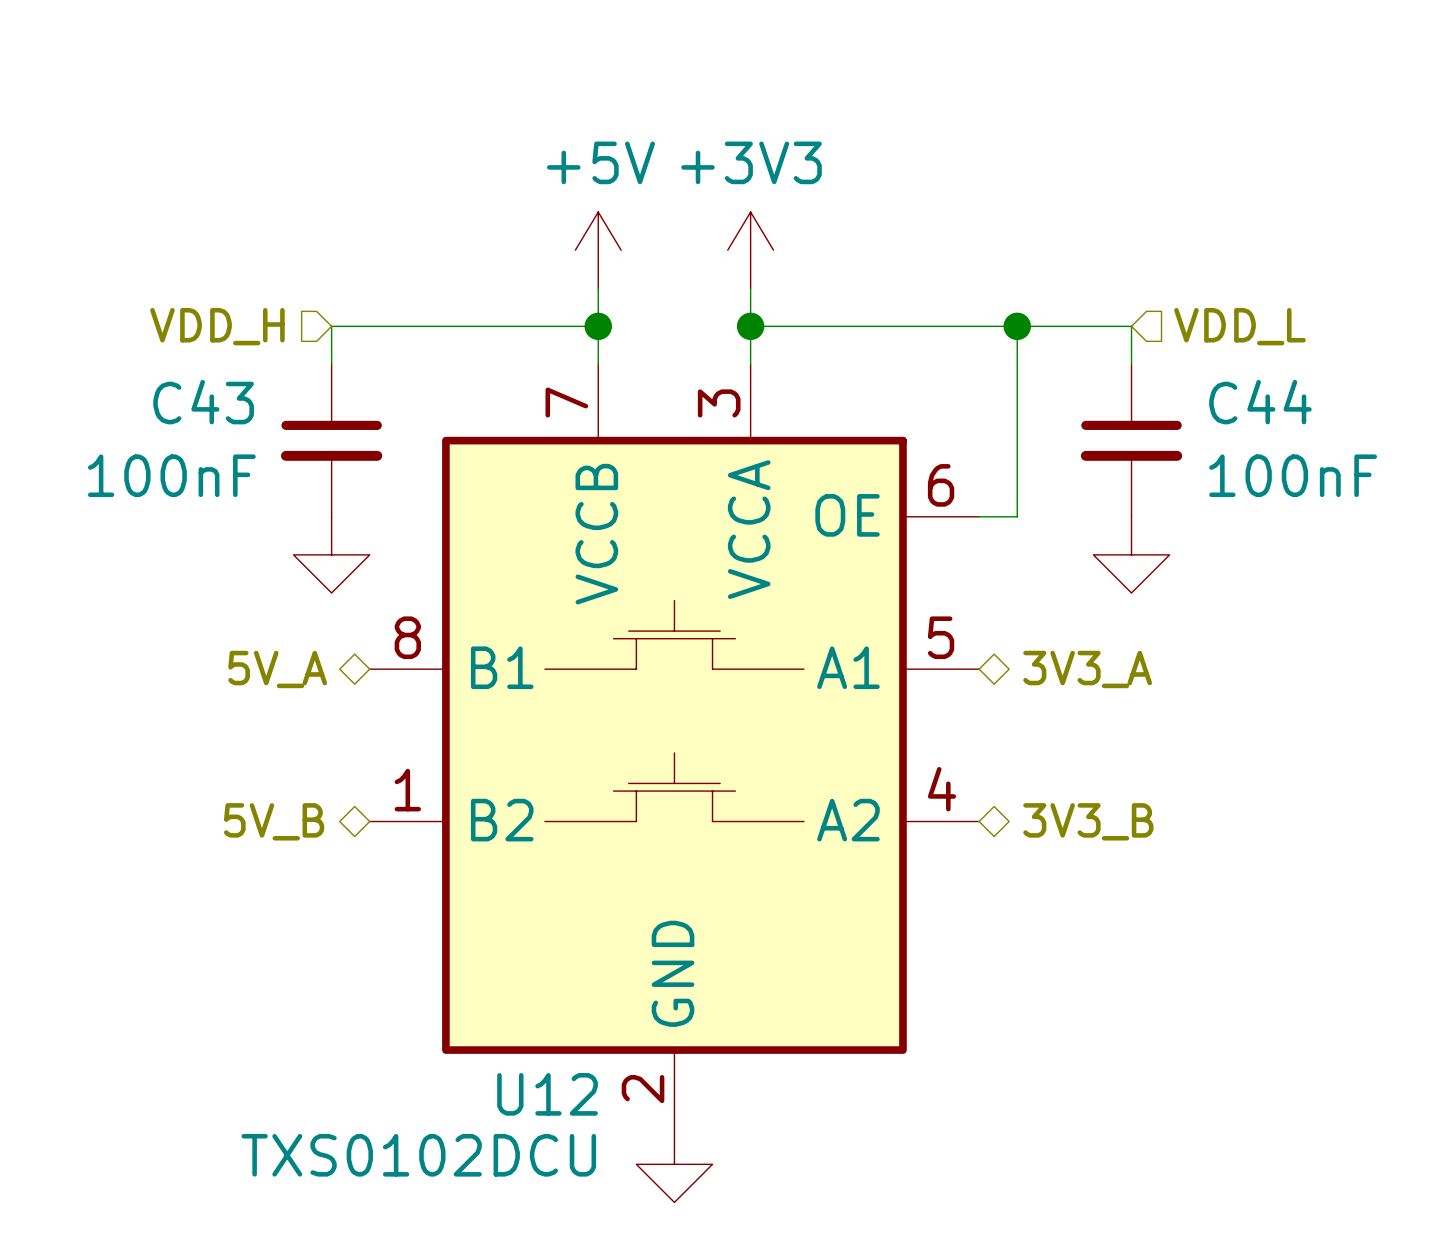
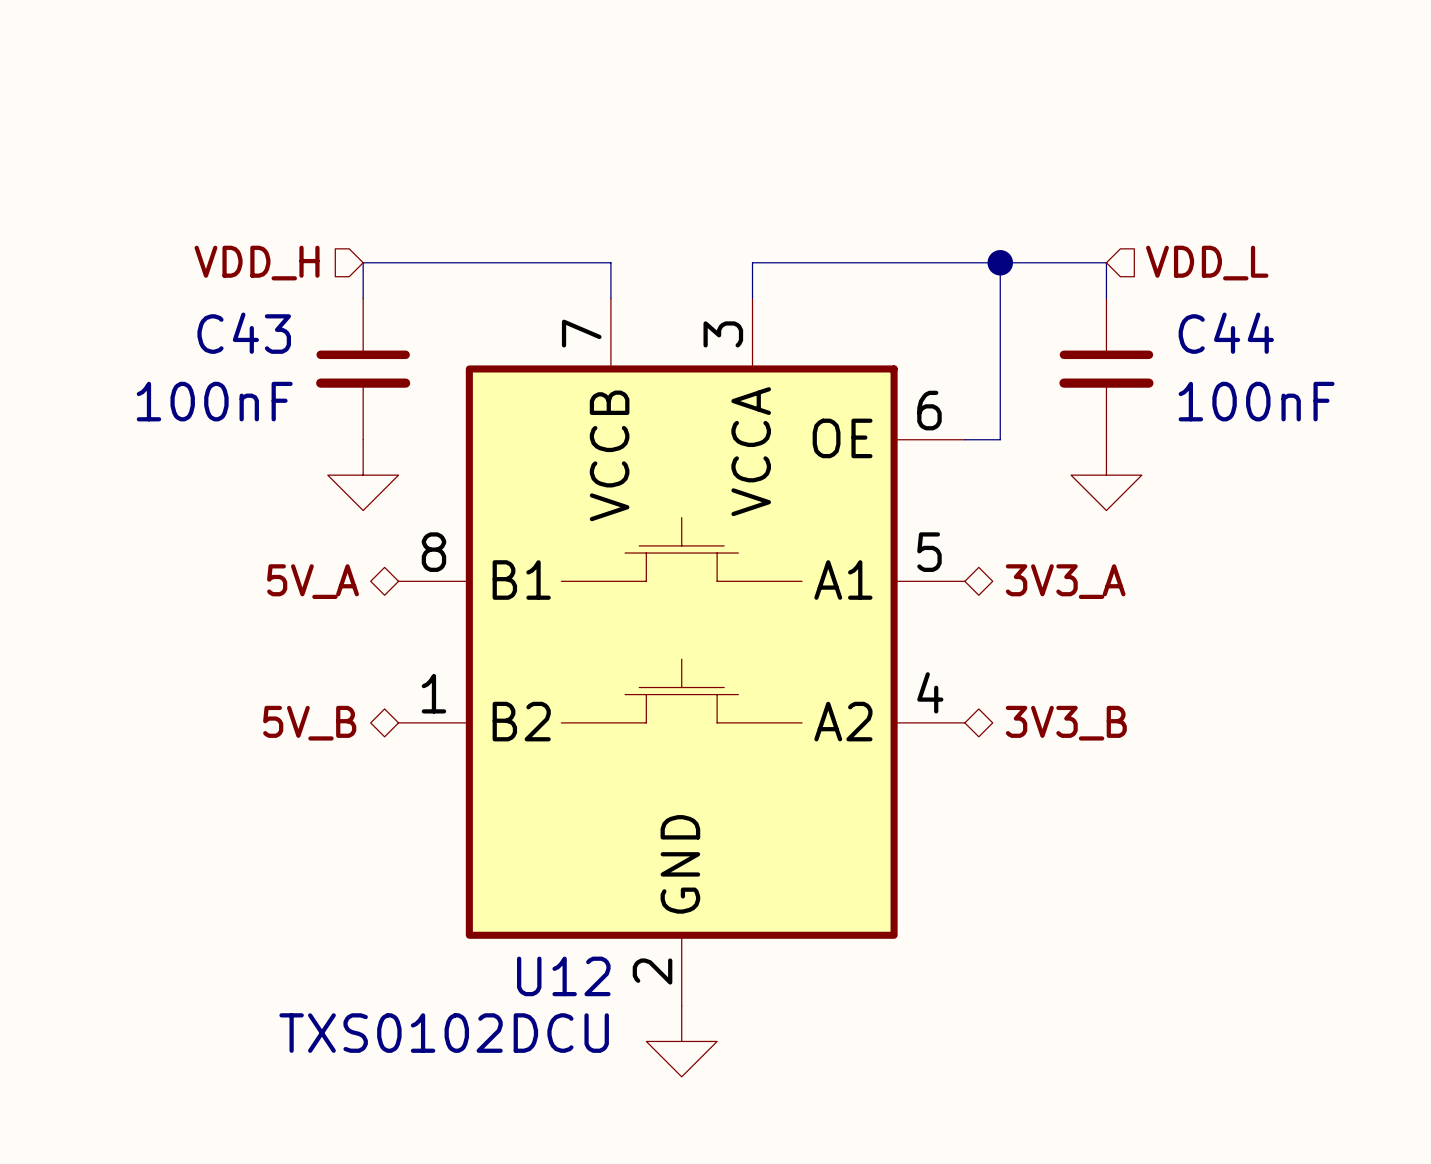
power symbol: +5V (598, 250) -> none
power symbol: +3V3 (750, 250) -> none
wire: (598, 288) (598, 326) -> none
wire: (750, 288) (750, 326) -> none
junction: (598, 326) -> none
junction: (750, 326) -> none

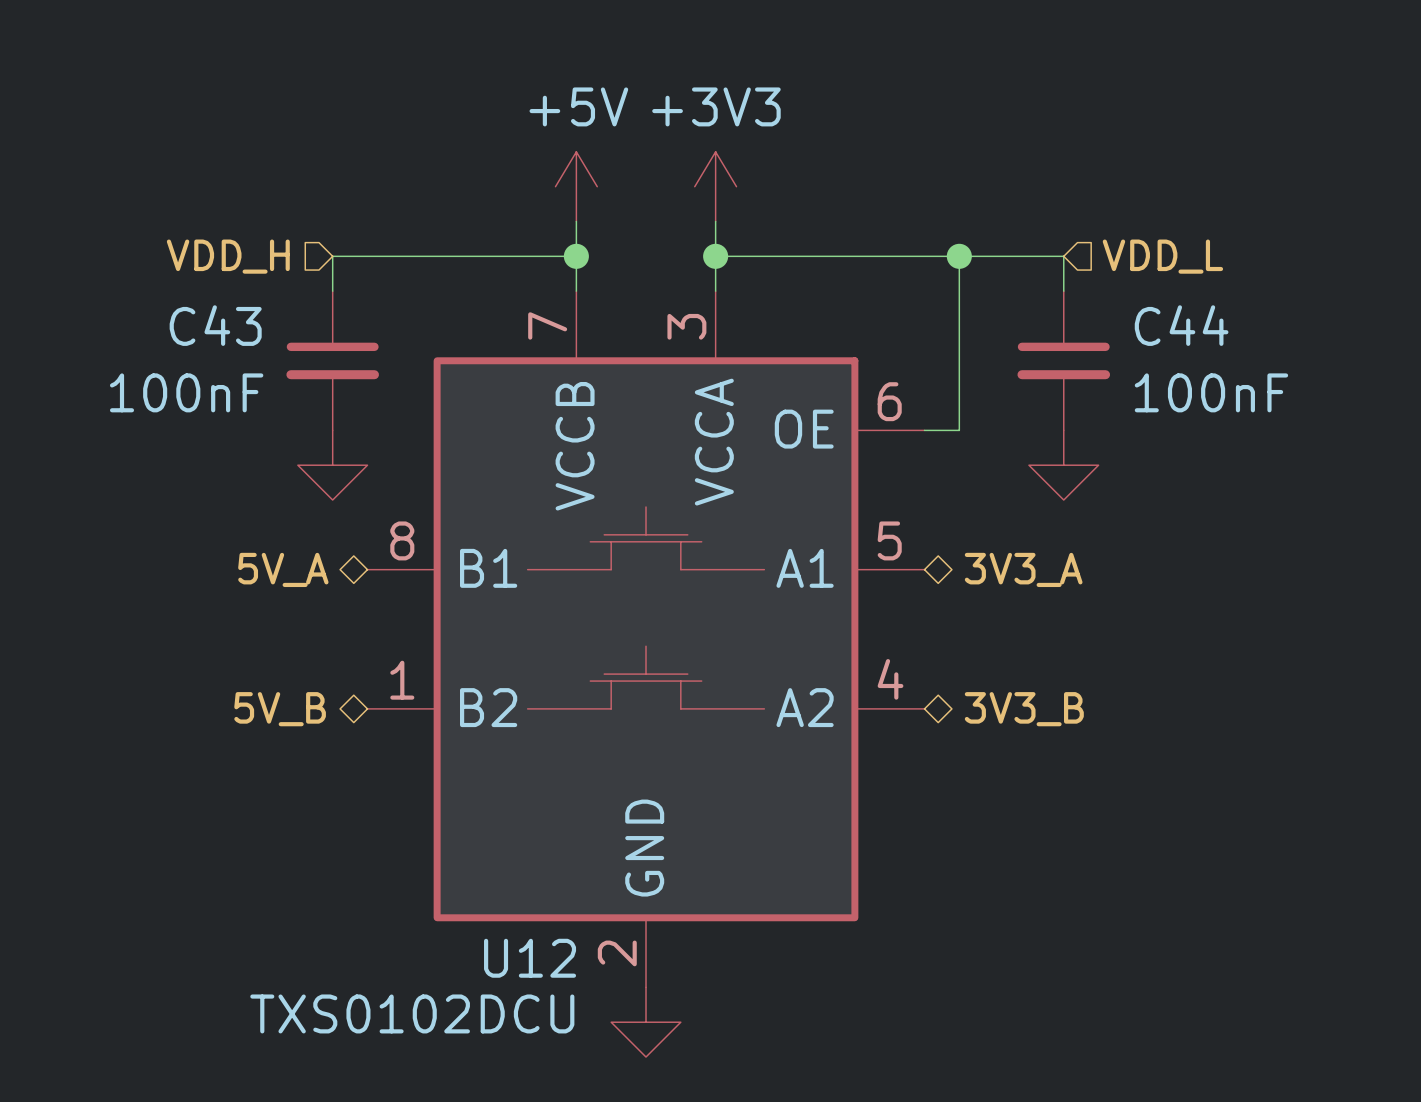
power symbol: none -> +5V (576, 186)
power symbol: none -> +3V3 (715, 186)
wire: none -> (576, 221) (576, 256)
wire: none -> (715, 221) (715, 256)
junction: none -> (576, 256)
junction: none -> (715, 256)

